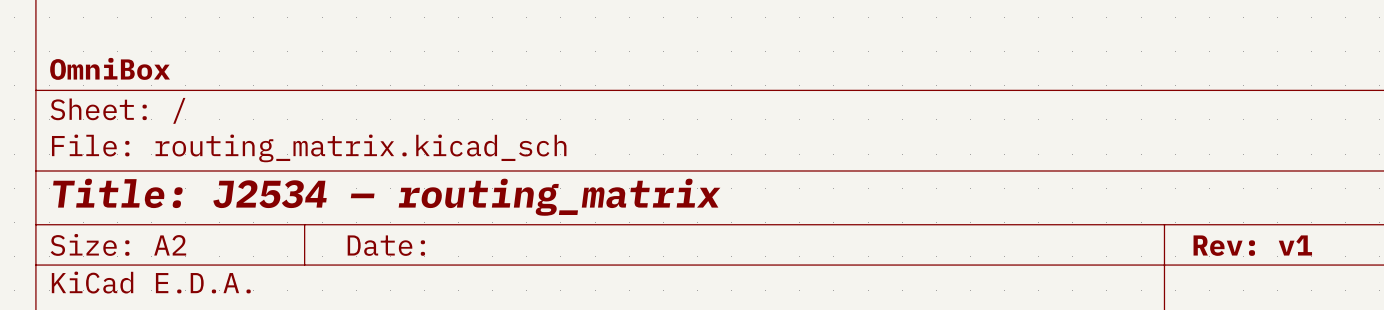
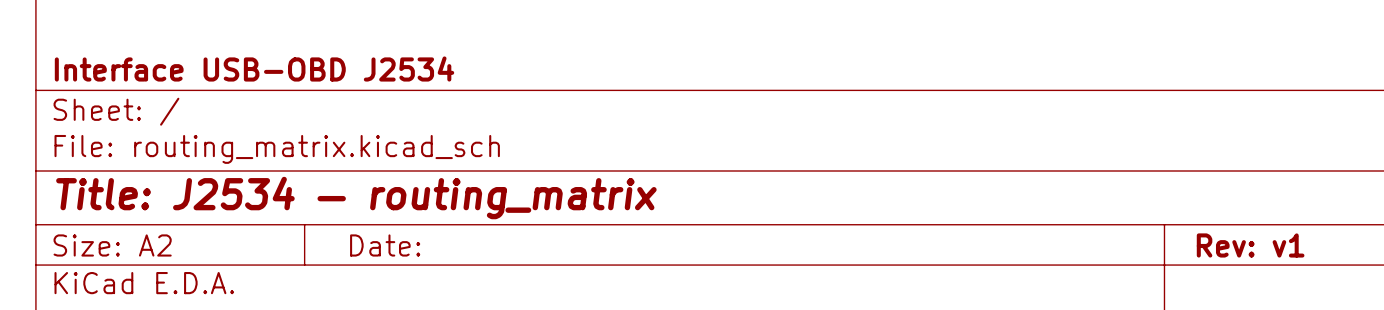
title block: OmniBox (110, 68) -> Interface USB-OBD J2534 (254, 69)

